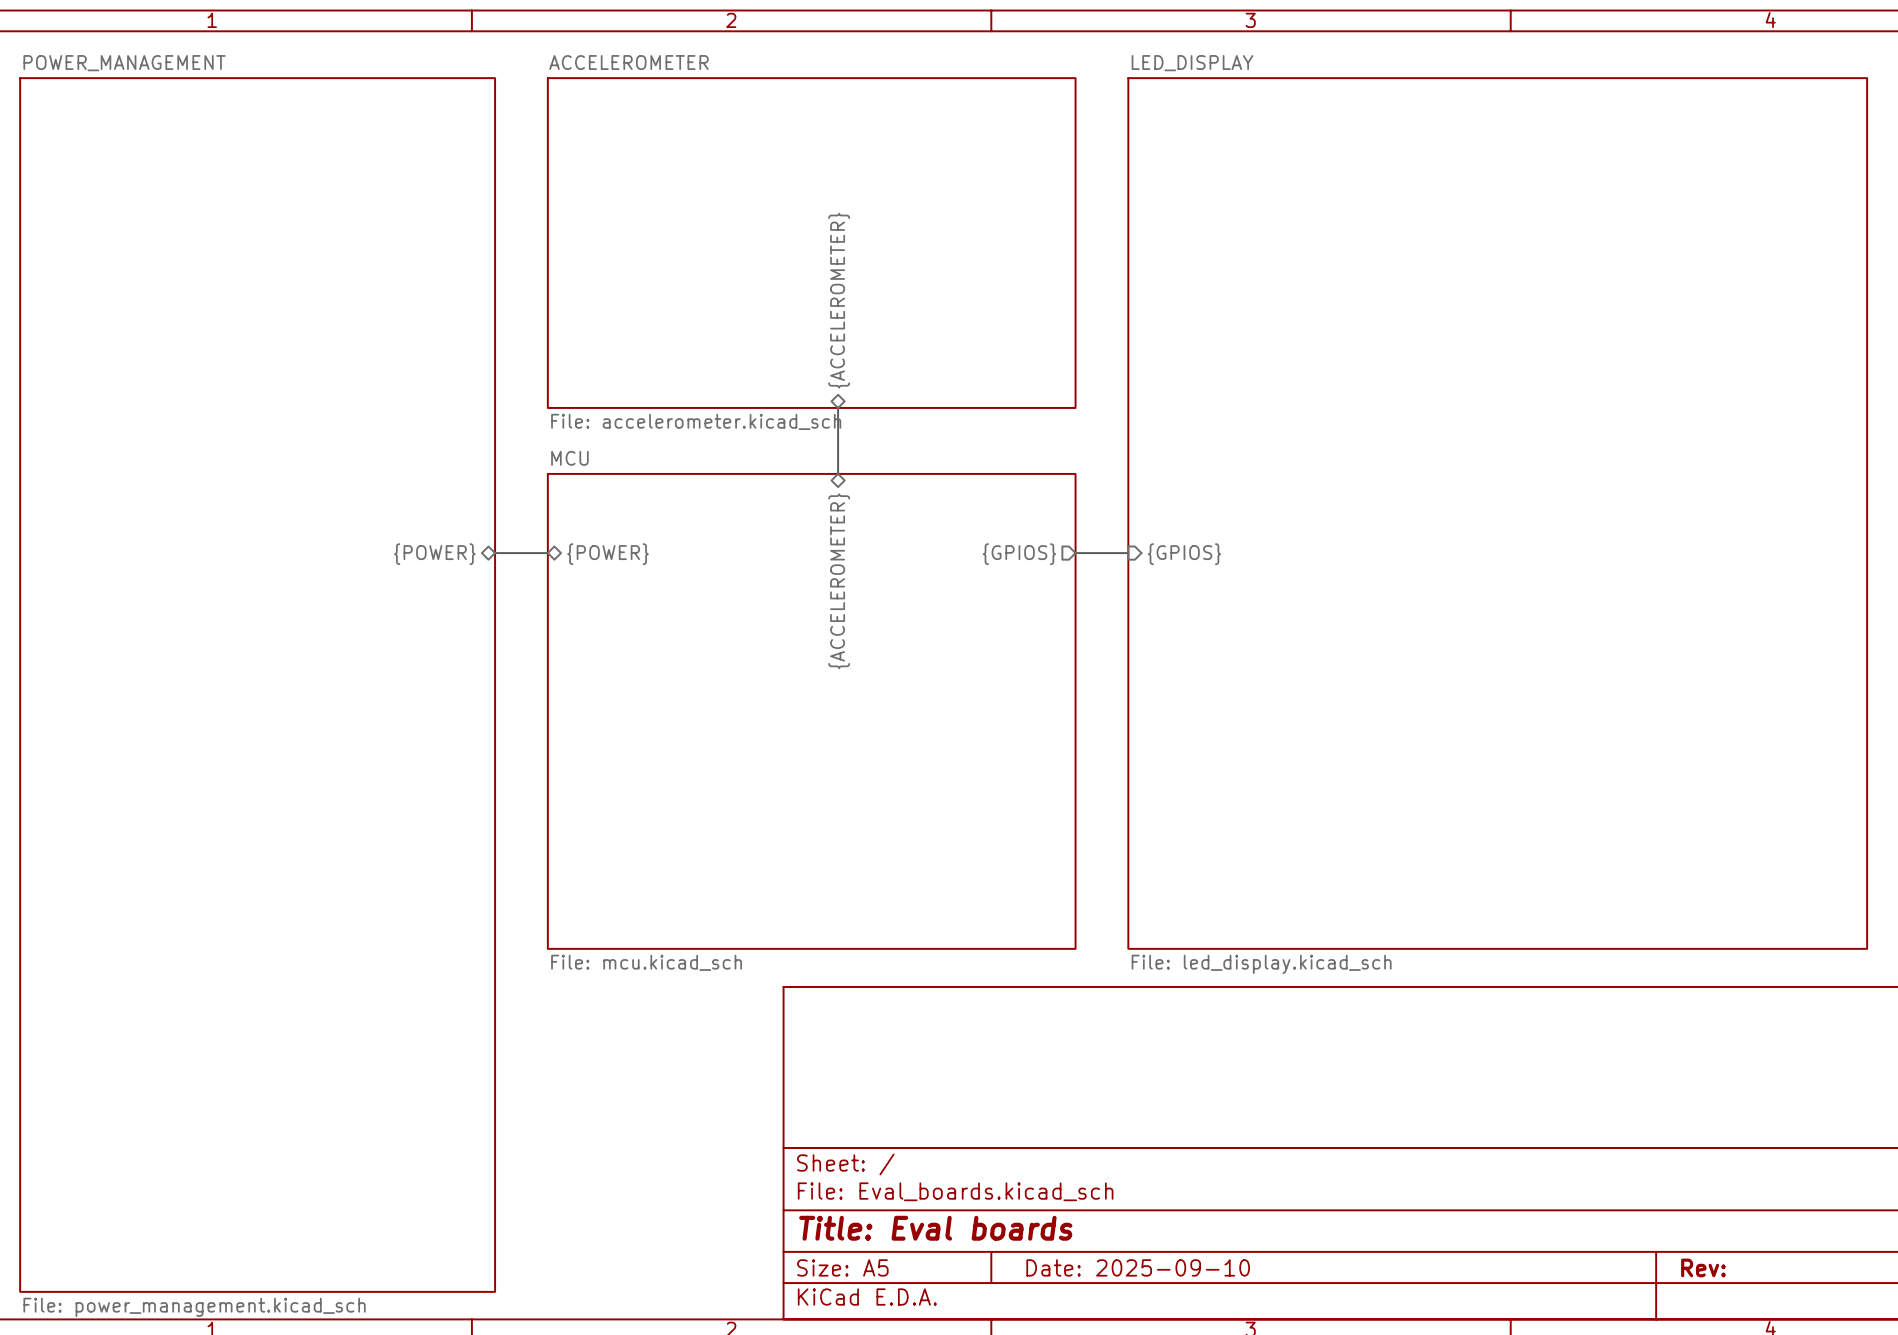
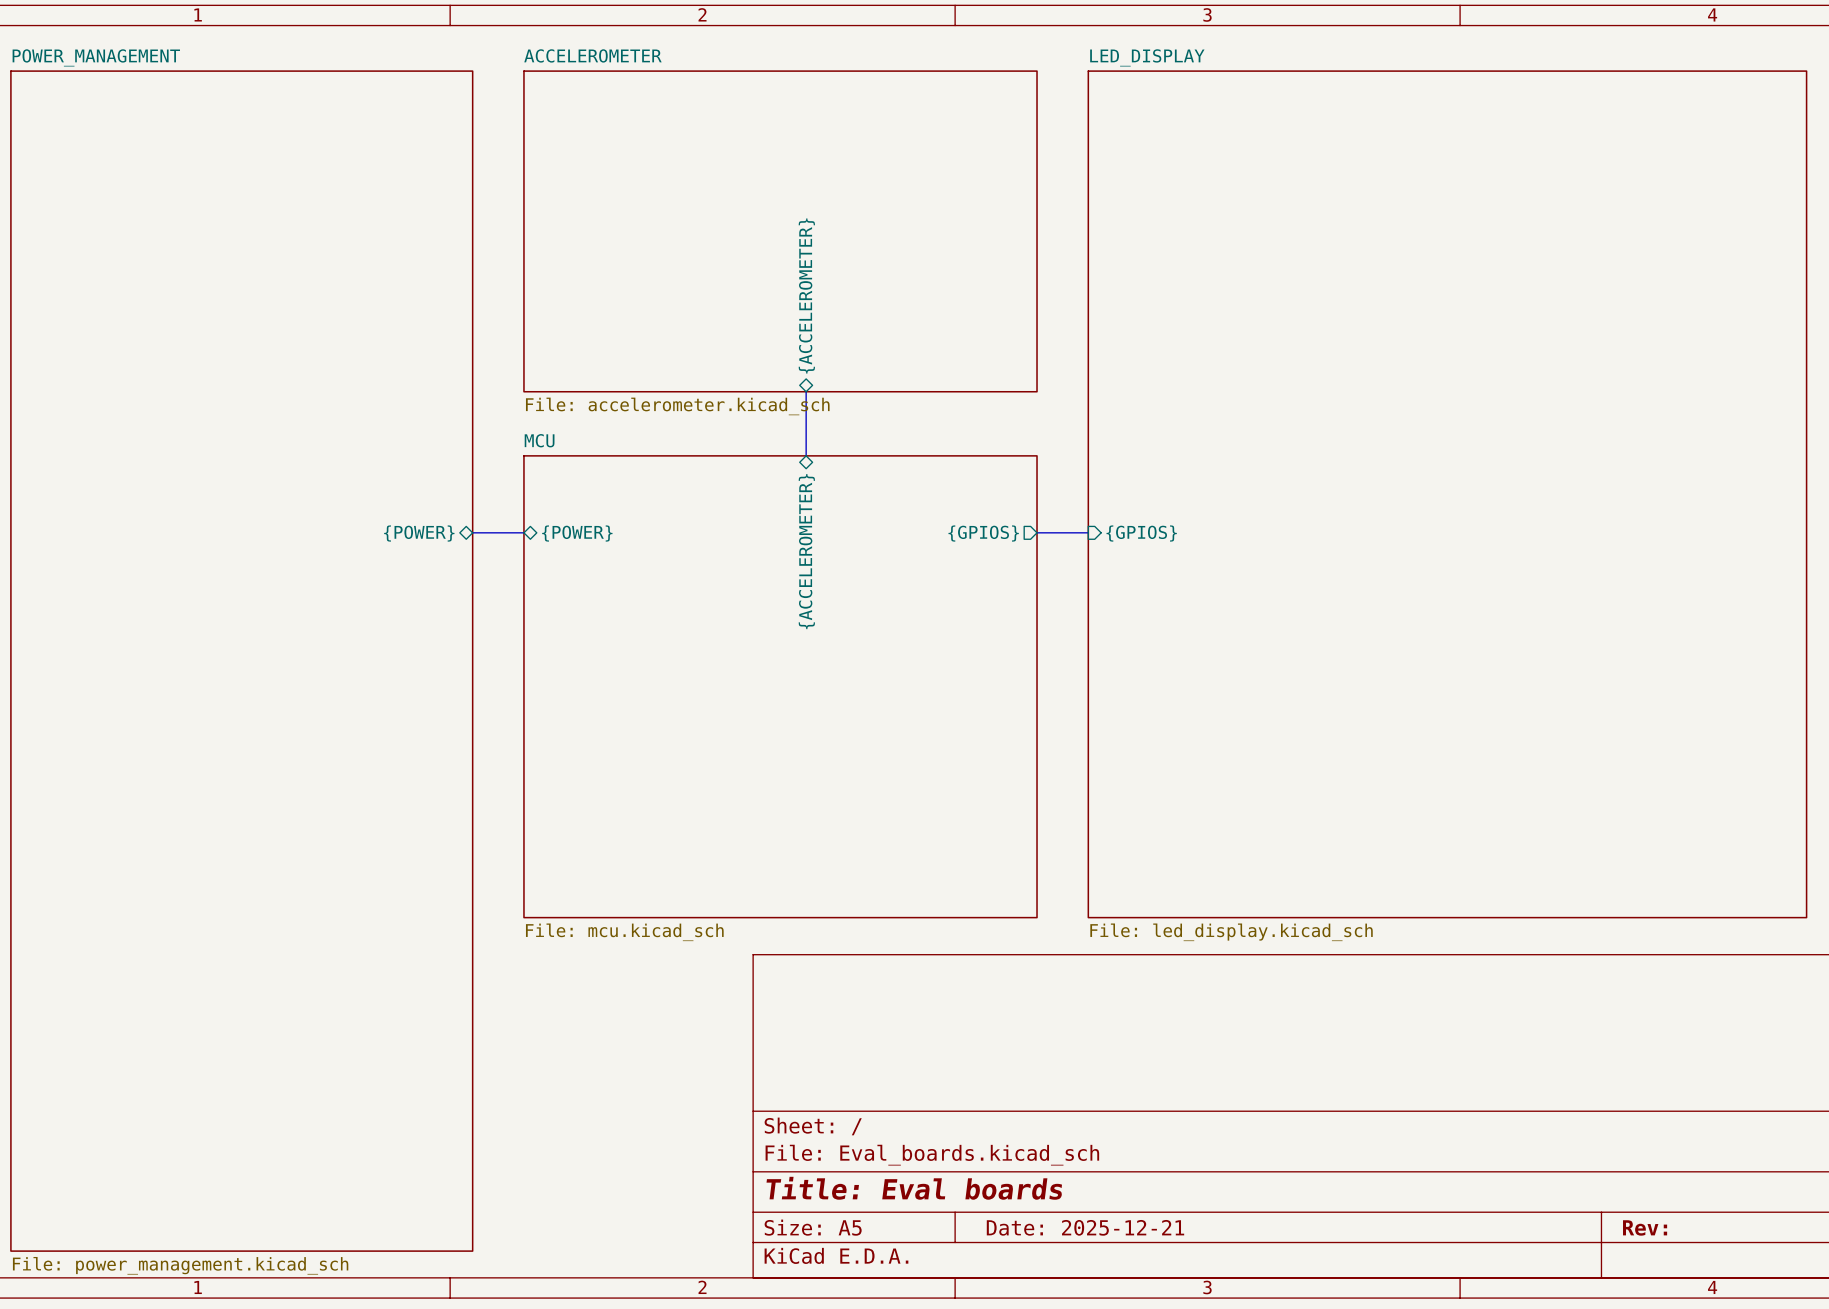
title block: Date: 2025-09-10 (1138, 1267) -> Date: 2025-12-21 (1085, 1227)

